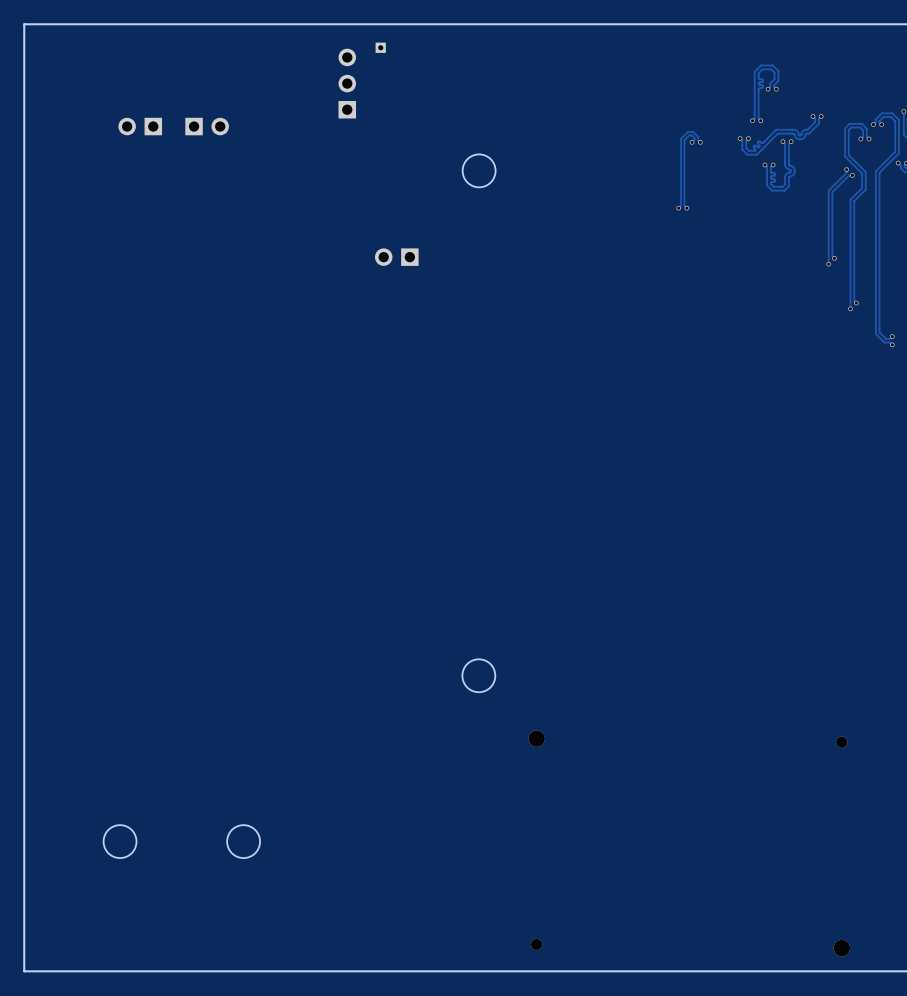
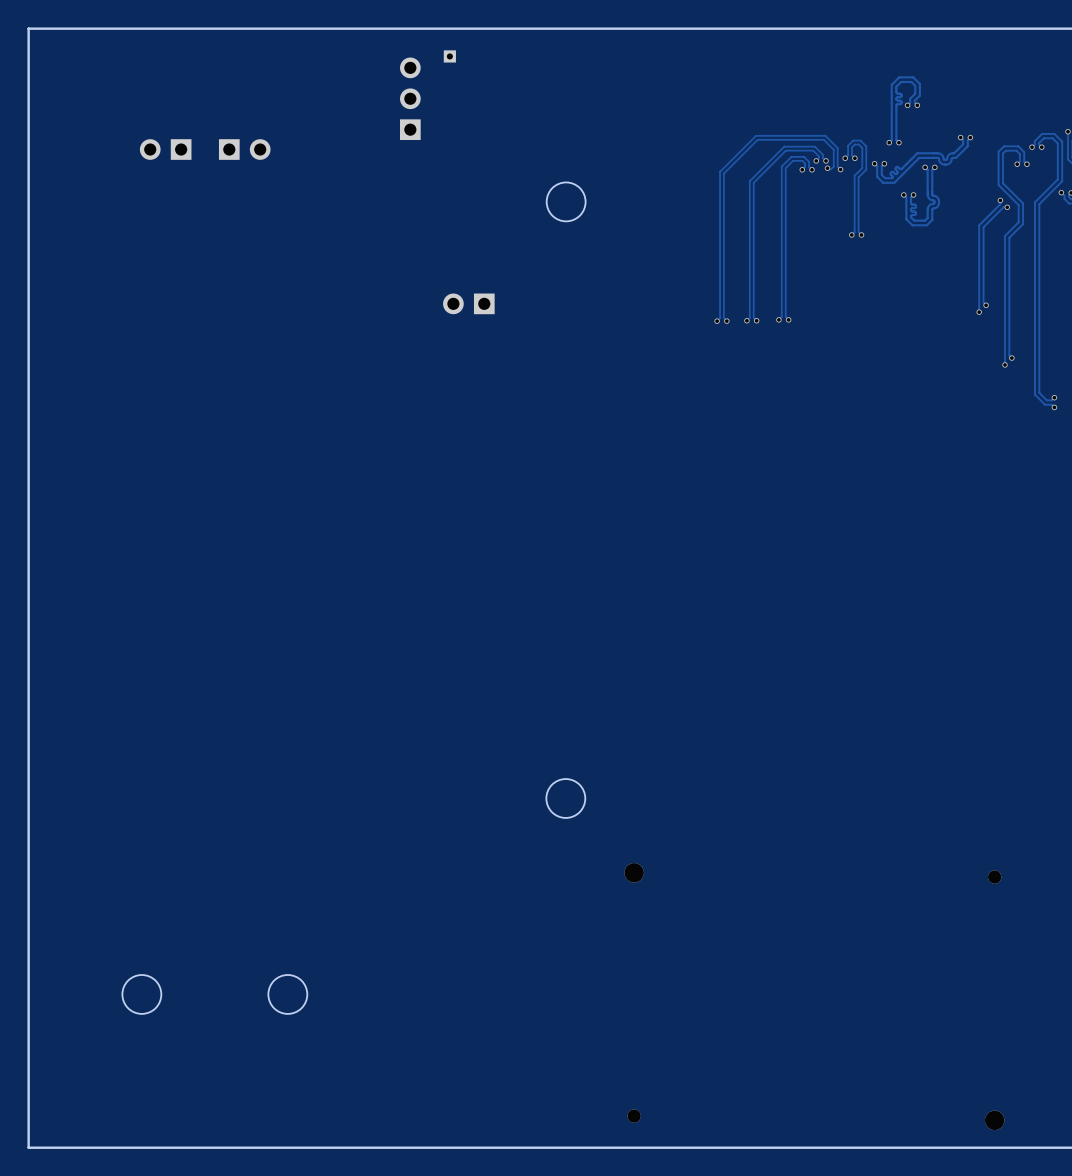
track: none -> (845, 158) (848, 155) (848, 145) (853, 140) (860, 140) (866, 146) (866, 169) (858, 177) (858, 232) (861, 235)
via: none -> (845, 158)
track: none -> (854, 158) (852, 155) (852, 147) (854, 144) (858, 144) (862, 148) (862, 168) (854, 175) (854, 232) (851, 235)
via: none -> (854, 158)
track: none -> (816, 160) (819, 156) (813, 150) (785, 150) (753, 182) (753, 317) (756, 320)
via: none -> (816, 160)
track: none -> (825, 160) (814, 146) (784, 146) (749, 181) (749, 317) (746, 320)
via: none -> (825, 160)
track: (692, 142) (694, 138) (691, 135) (684, 140) (684, 205) (686, 208) -> none
via: (692, 142) -> none
track: (700, 142) (693, 132) (687, 132) (681, 138) (681, 205) (678, 208) -> none
track: none -> (802, 169) (805, 166) (802, 160) (793, 160) (785, 168) (785, 317) (788, 319)
via: none -> (802, 169)
track: none -> (811, 169) (809, 166) (809, 161) (804, 156) (791, 156) (781, 166) (781, 317) (778, 319)
via: none -> (811, 169)
track: none -> (830, 169) (833, 166) (833, 149) (823, 139) (757, 139) (723, 173) (723, 318) (726, 321)
track: none -> (840, 169) (837, 166) (837, 148) (825, 135) (756, 135) (720, 171) (720, 318) (717, 321)
via: none -> (840, 169)
via: none -> (851, 235)
via: none -> (861, 235)
via: (678, 208) -> none
via: (686, 208) -> none
via: none -> (778, 319)
via: none -> (788, 319)
via: none -> (717, 321)
via: none -> (726, 321)
via: none -> (746, 320)
via: none -> (756, 320)

